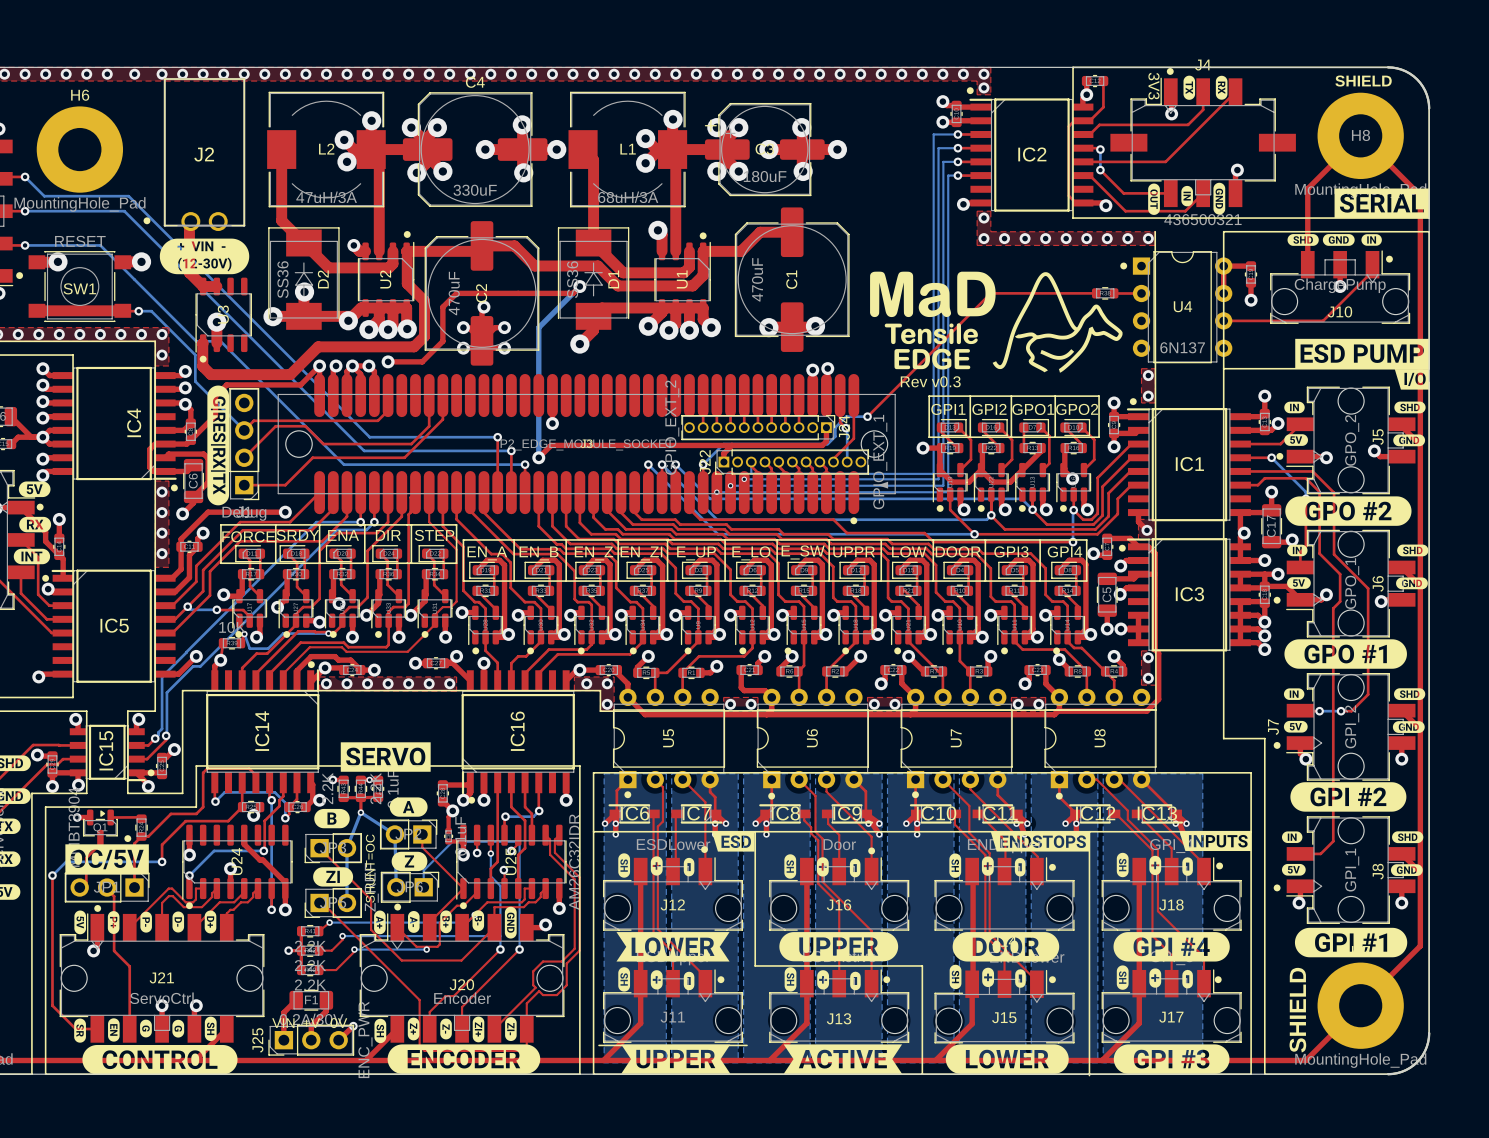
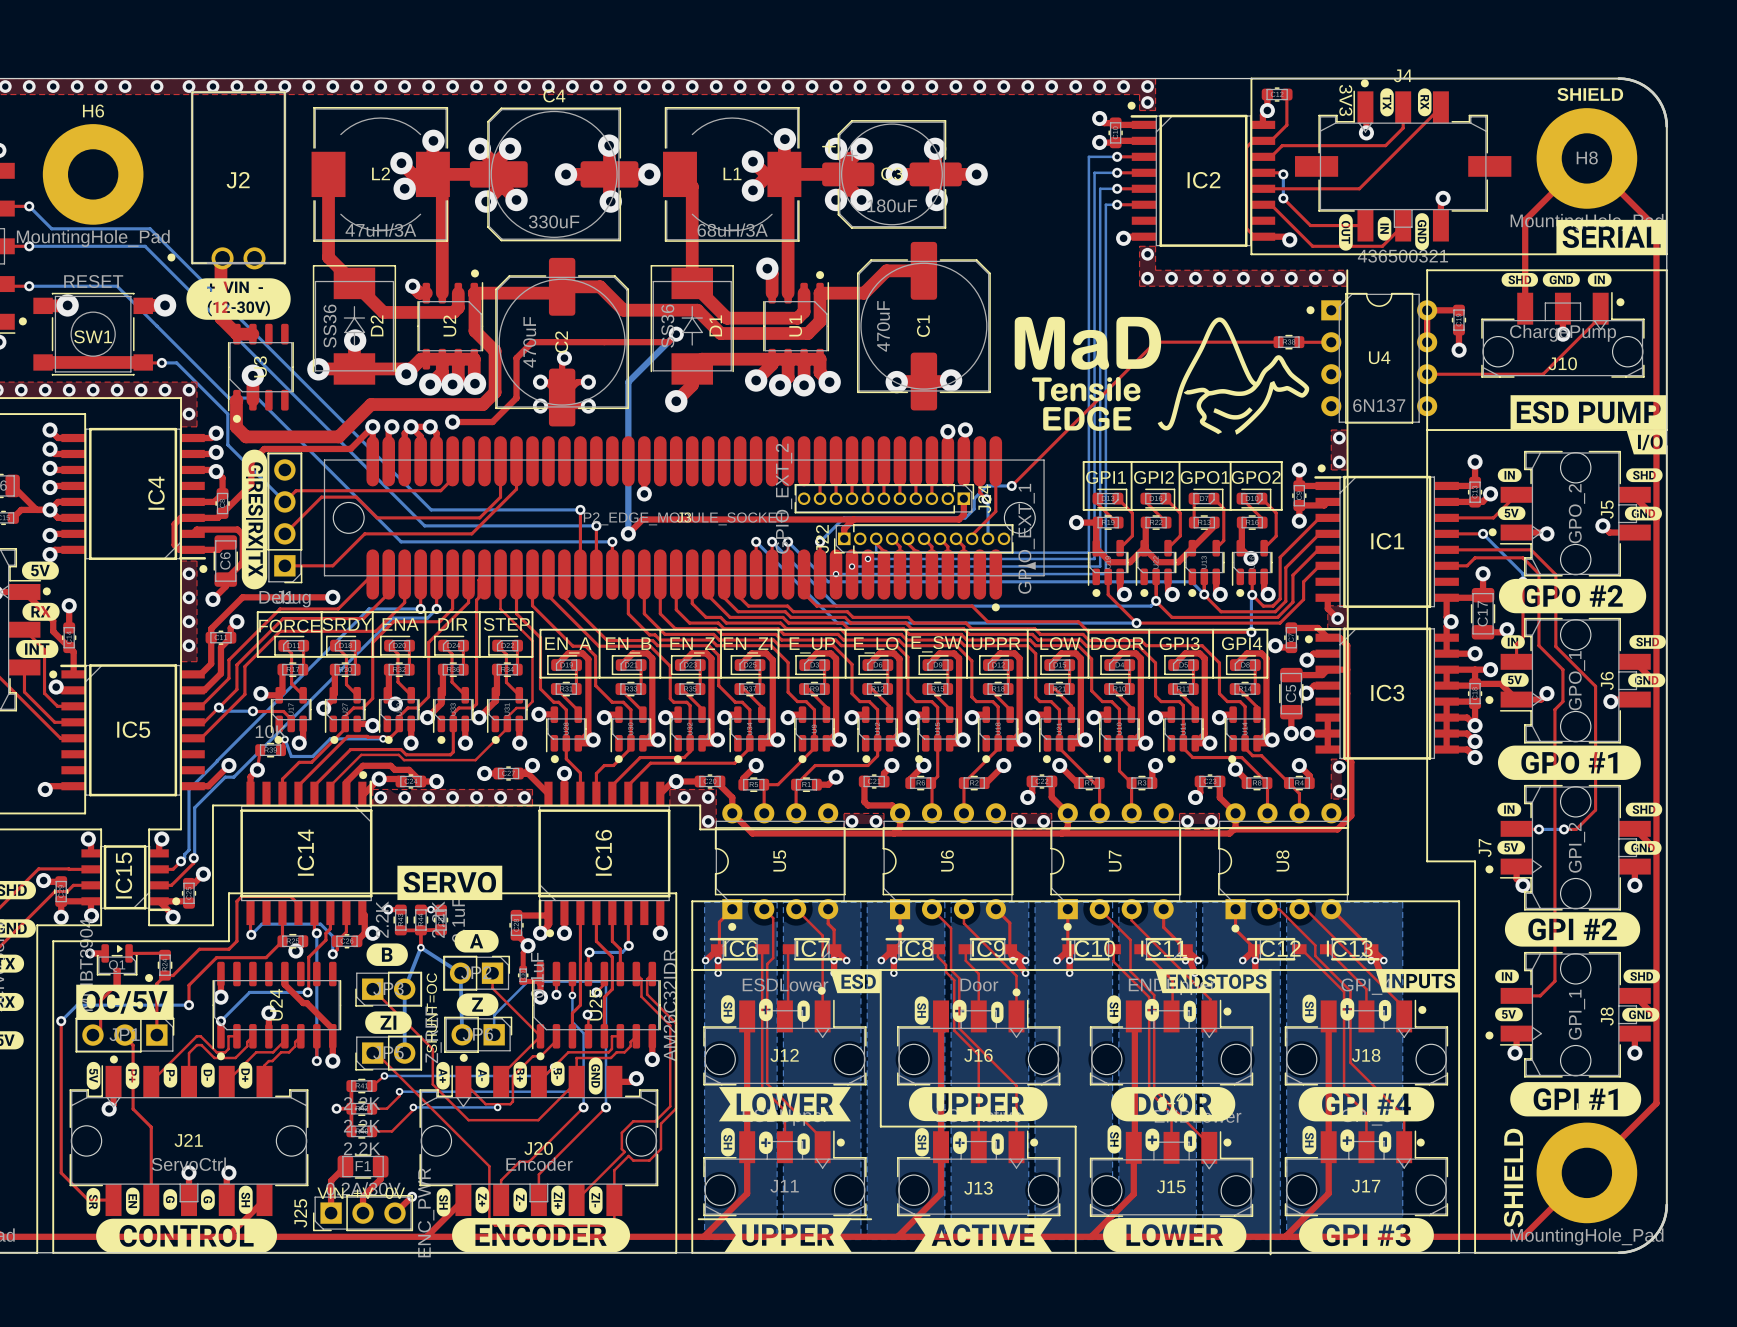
text: Rev v0.3 (930, 381) -> none

